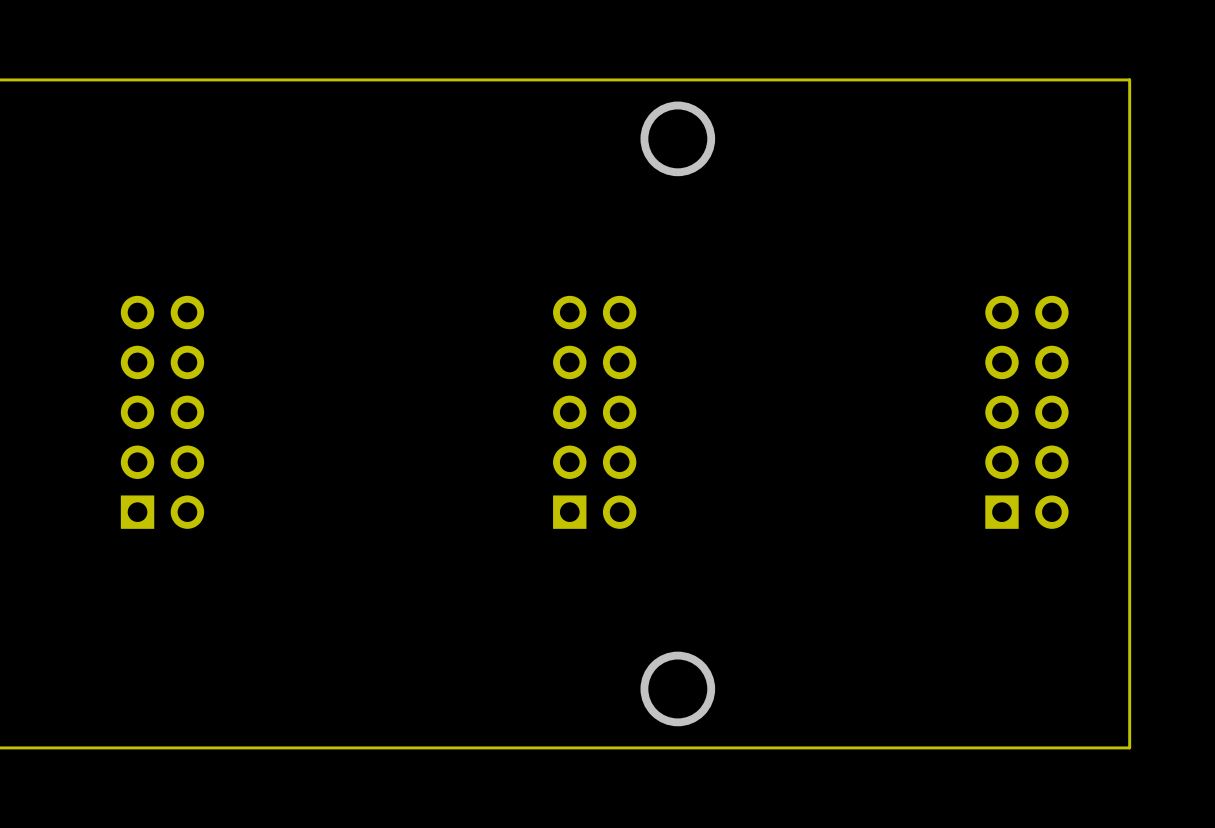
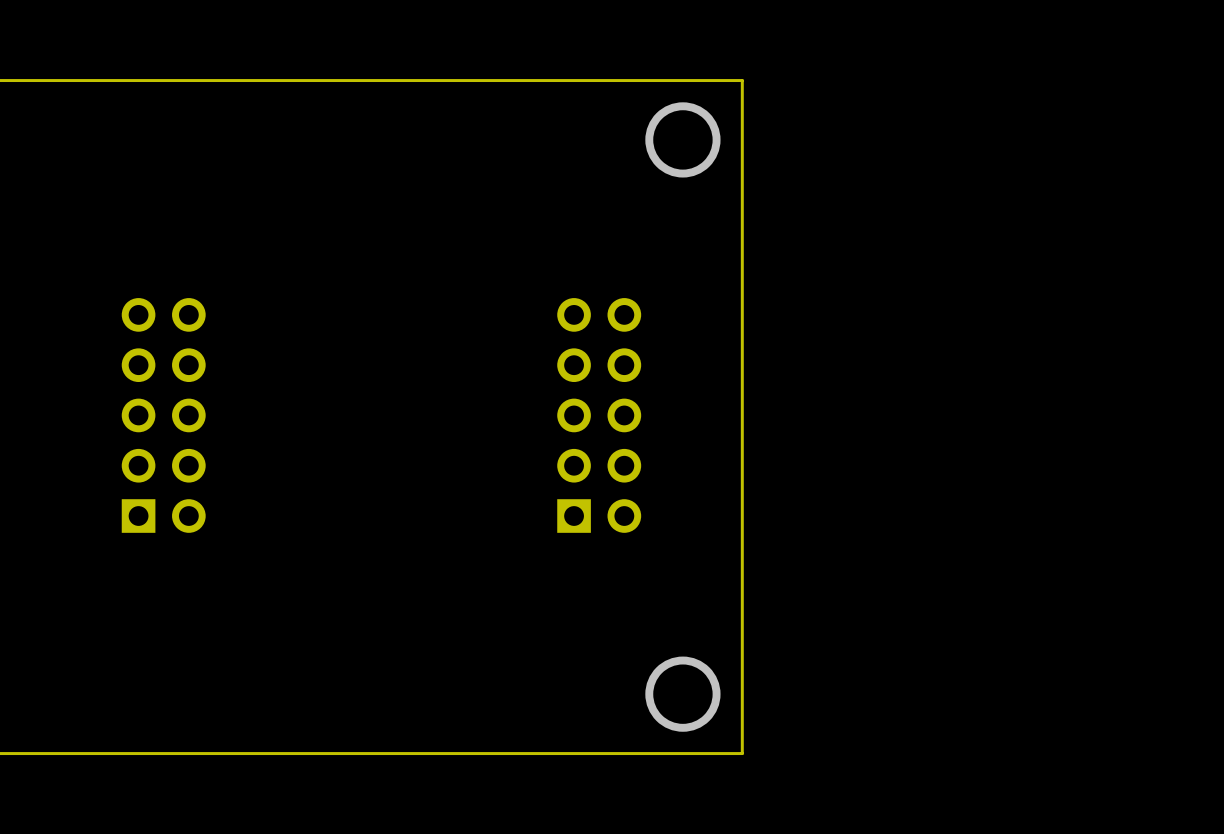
board edge: (736, 79) (1129, 79) (1129, 747) (736, 747) -> (742, 80) (742, 753)
part: (1026, 412) -> none

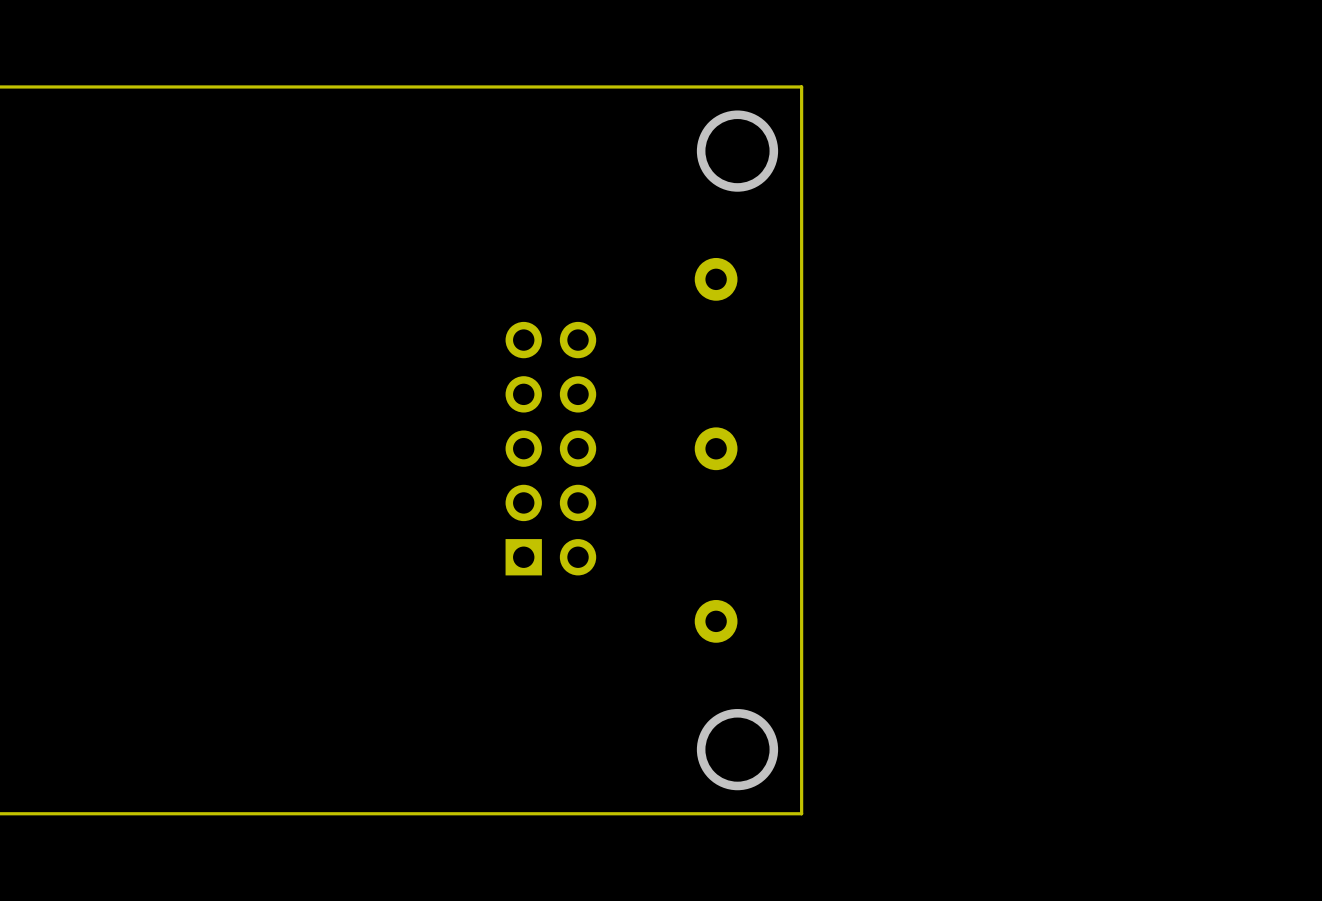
part: none -> (716, 279)
part: (163, 415) -> none
part position: (599, 415) -> (550, 448)
part: none -> (716, 448)
part: none -> (716, 621)

